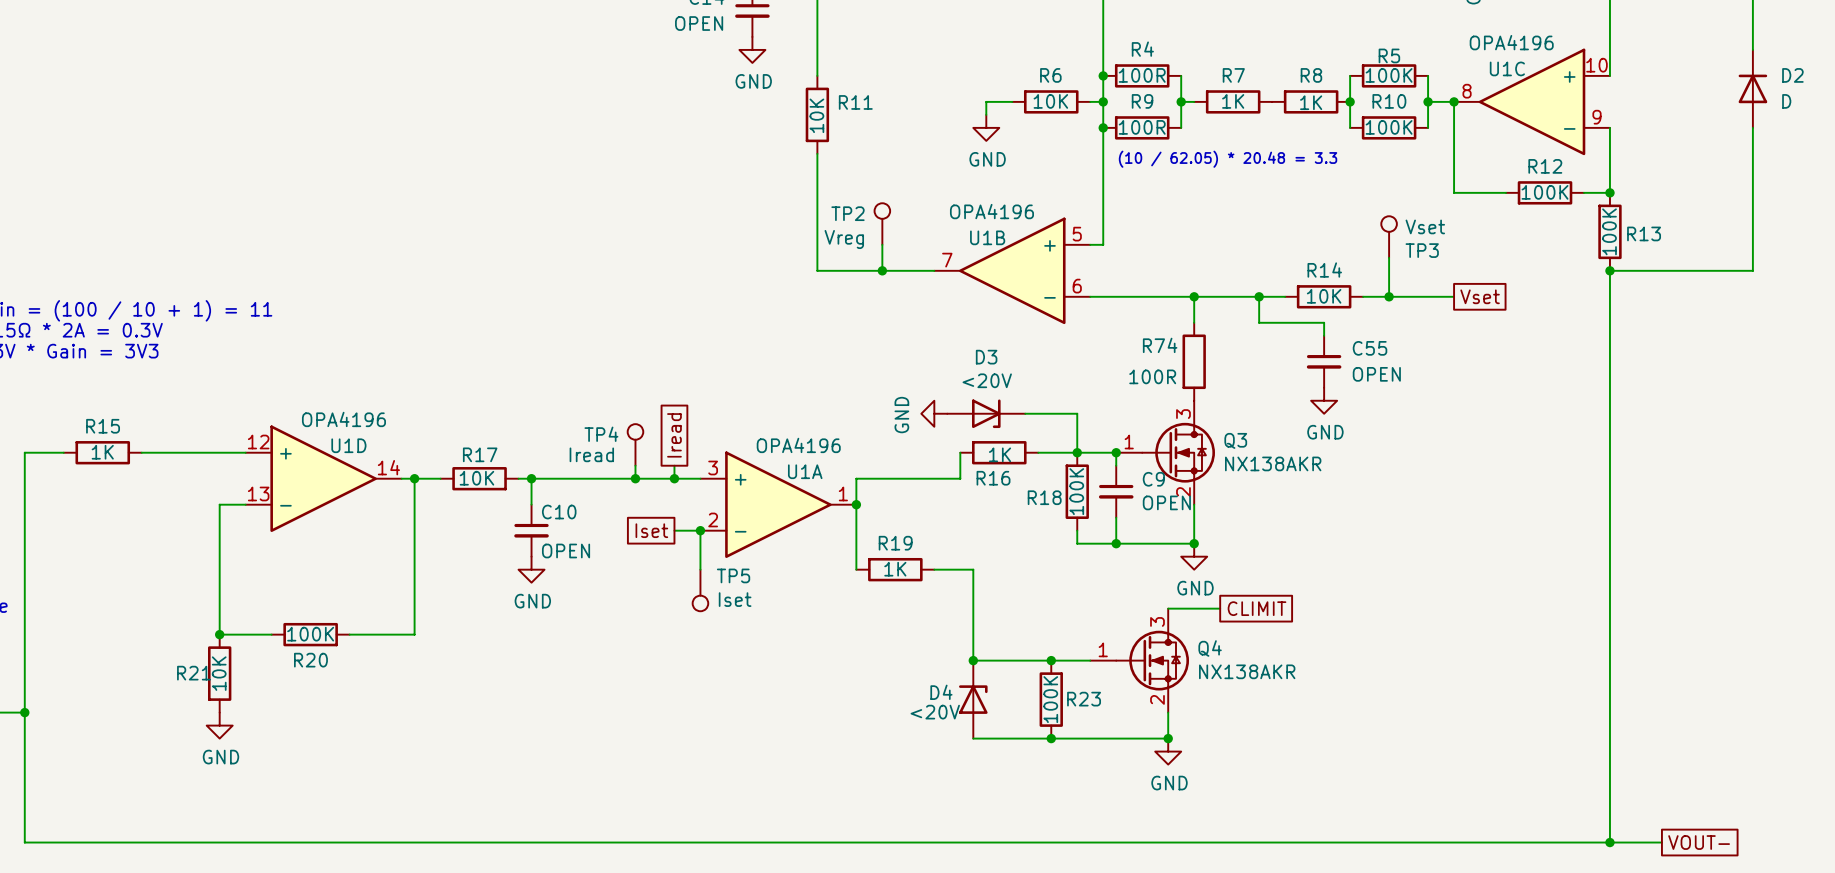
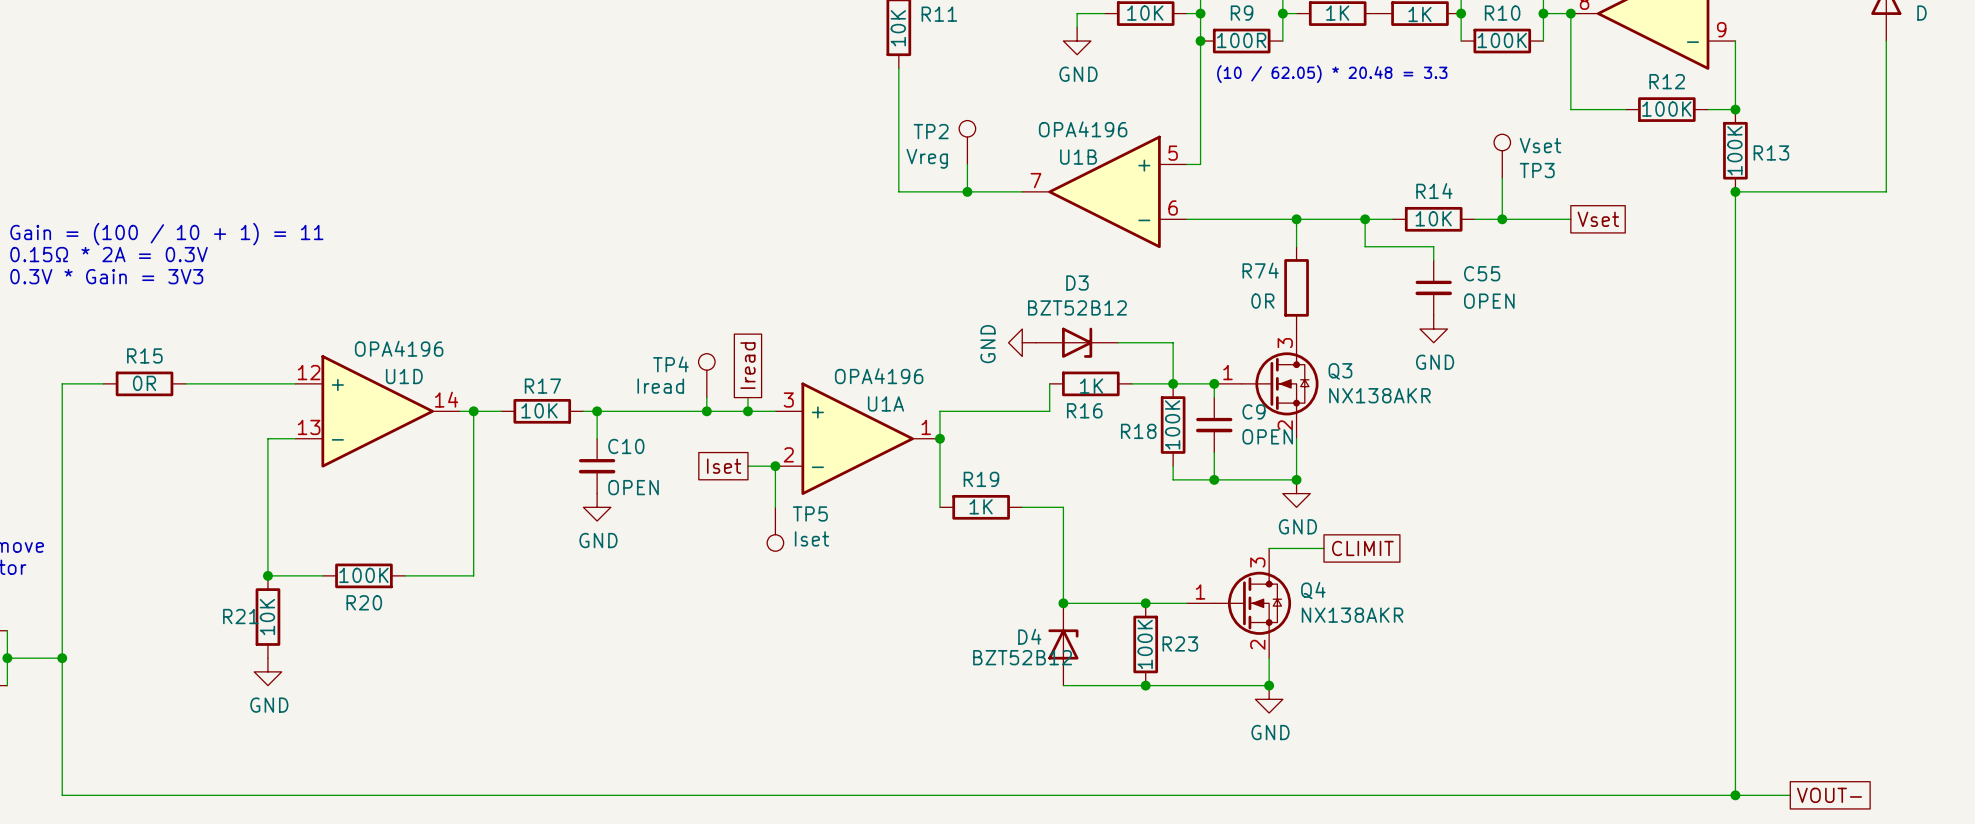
R74 value: 100R (1152, 376) -> 0R (1262, 301)
D3 value: <20V (987, 380) -> BZT52B12 (1077, 307)
R15 value: 1K (102, 452) -> 0R (144, 383)
D4 value: <20V (935, 712) -> BZT52B12 (1022, 657)

